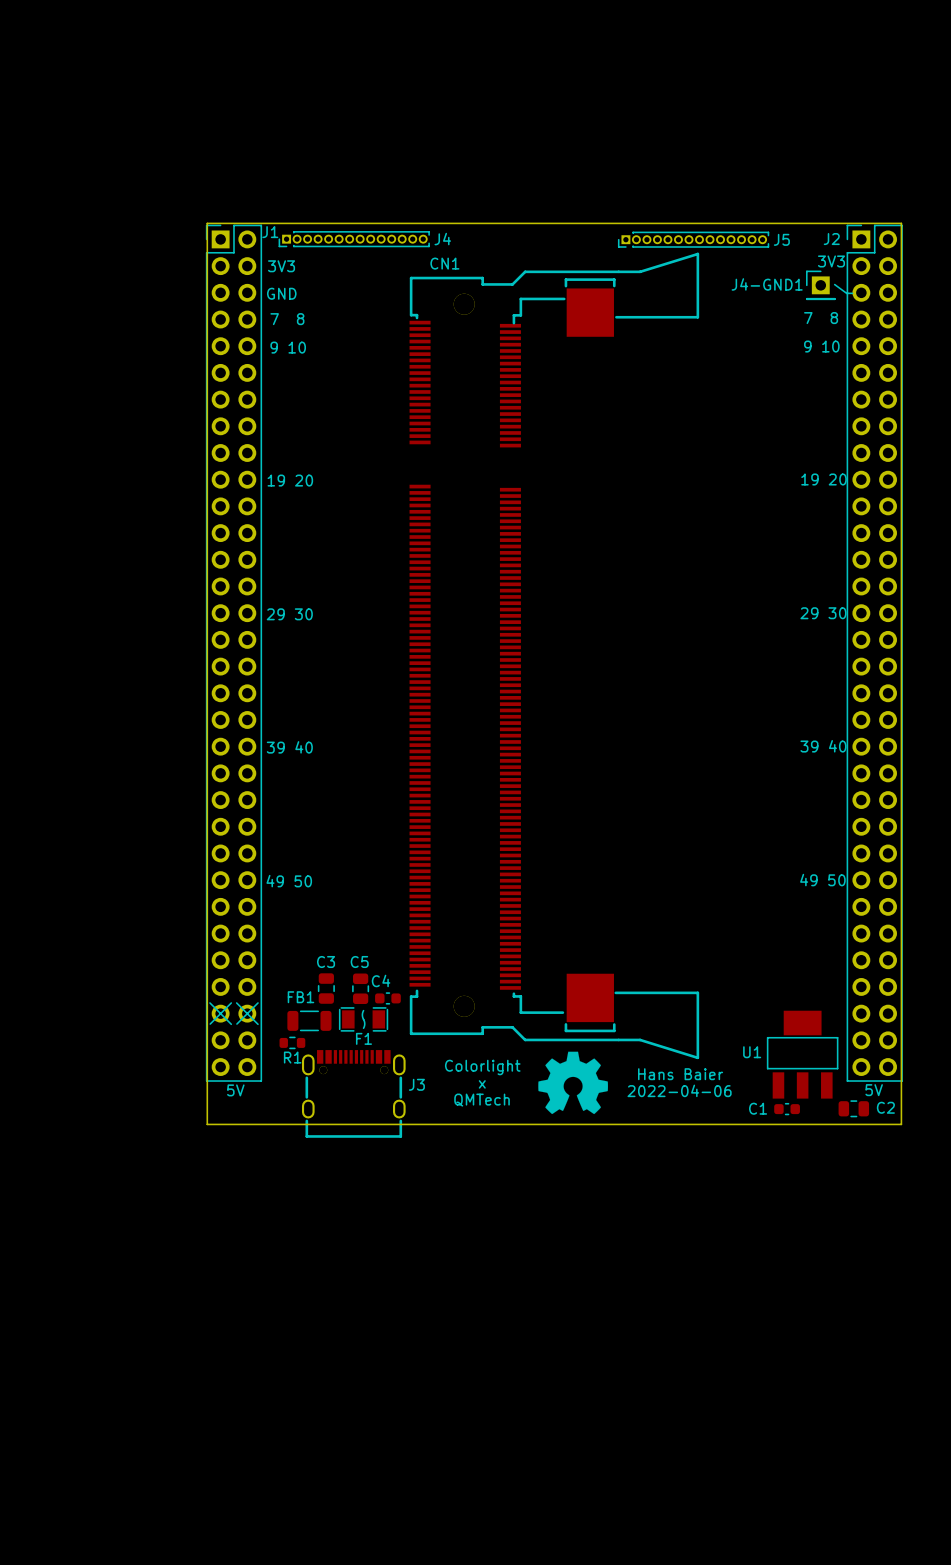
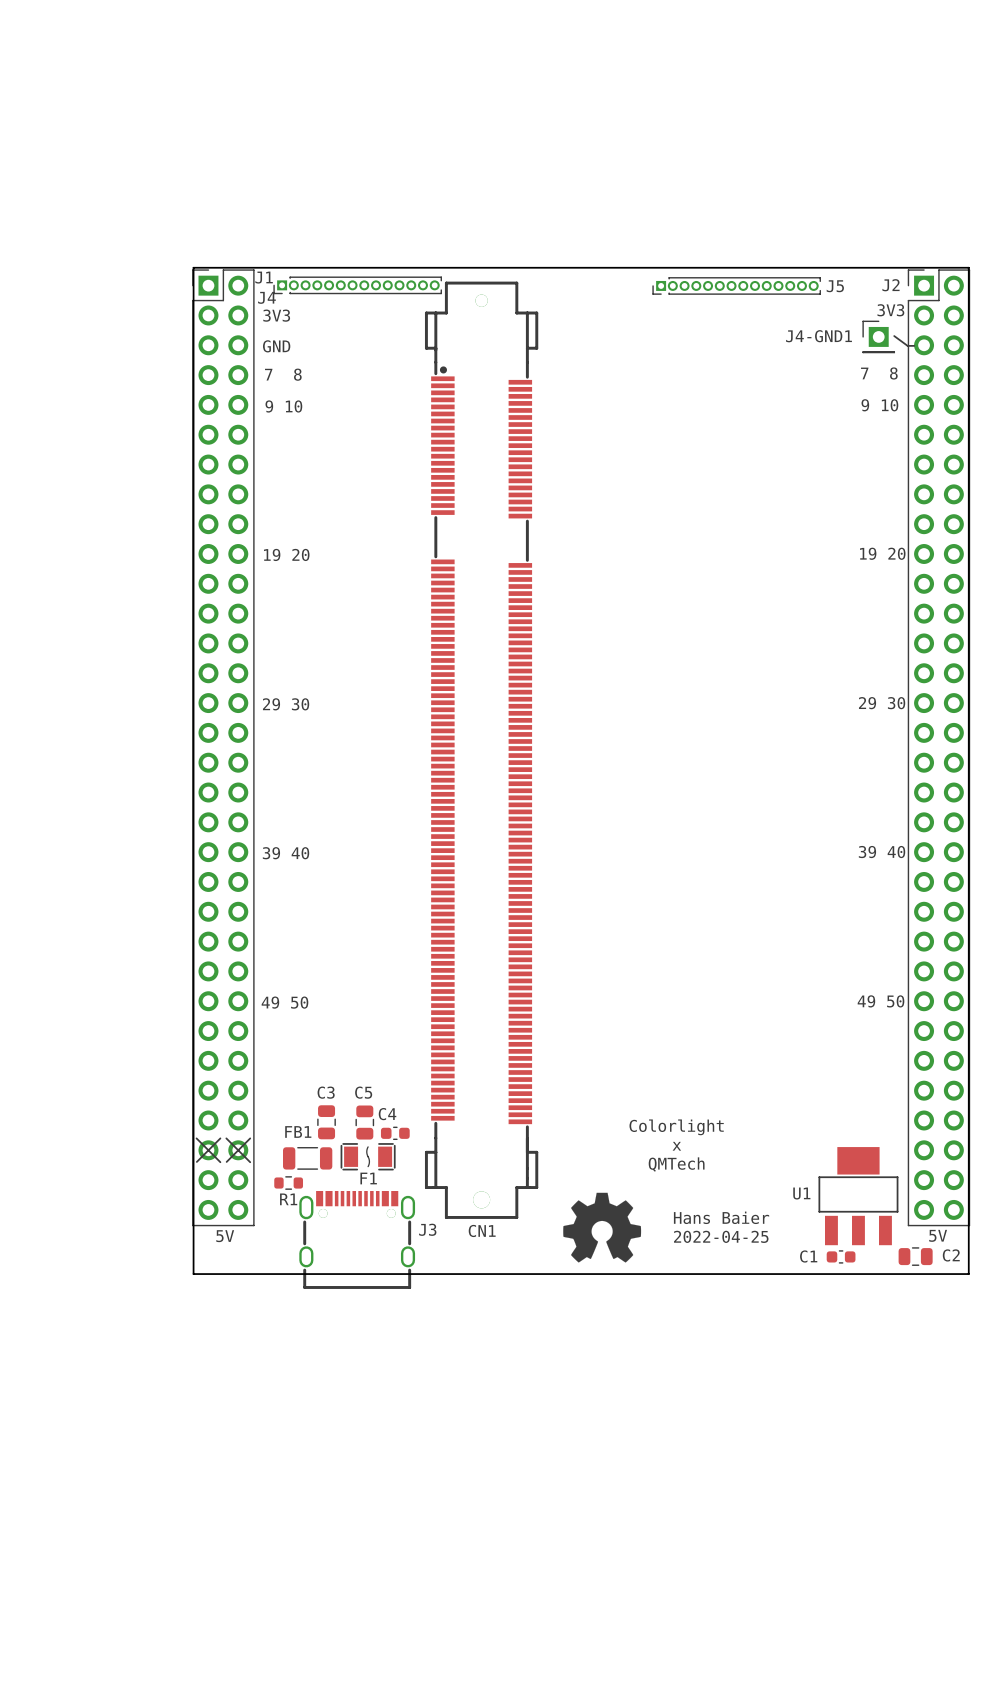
J4 name position: J4 (442, 239) -> J4 (266, 297)
CN1 footprint: [409, 252, 700, 1060] -> [424, 281, 539, 1219]
CN1 name position: CN1 (444, 263) -> CN1 (482, 1230)
text position: Colorlight (482, 1067) -> Colorlight (676, 1127)
text position: x (482, 1084) -> x (676, 1146)
text: 2022-04-06 (679, 1090) -> 2022-04-25 (721, 1236)
text position: QMTech (482, 1100) -> QMTech (676, 1164)

